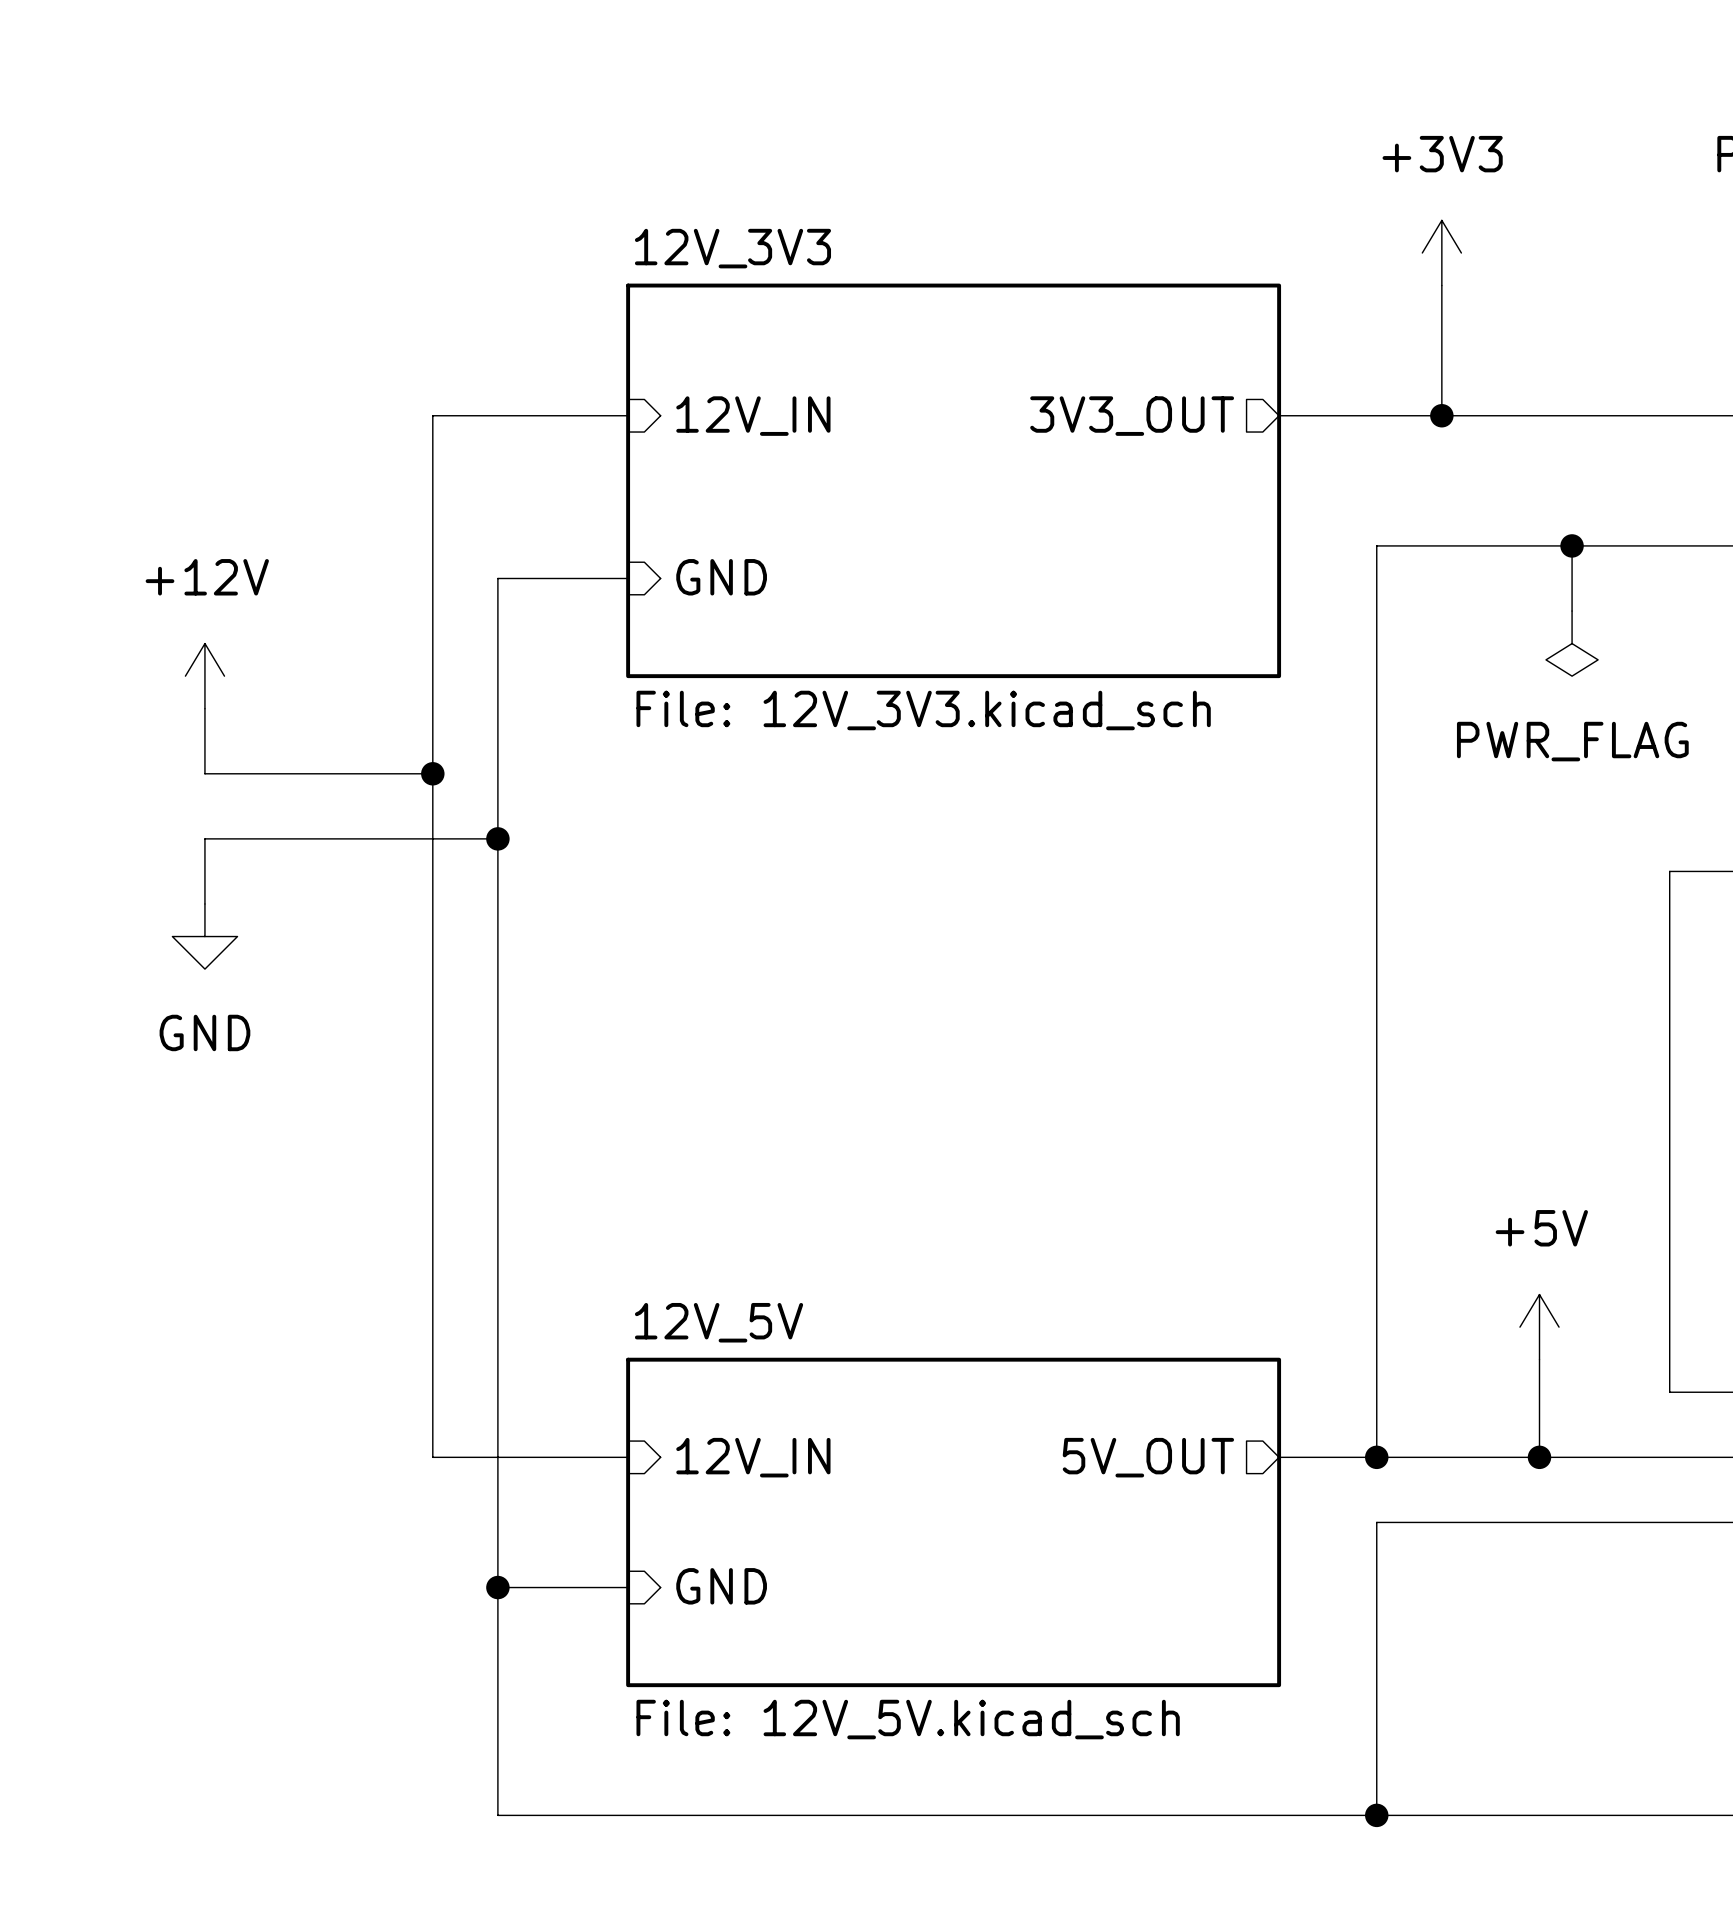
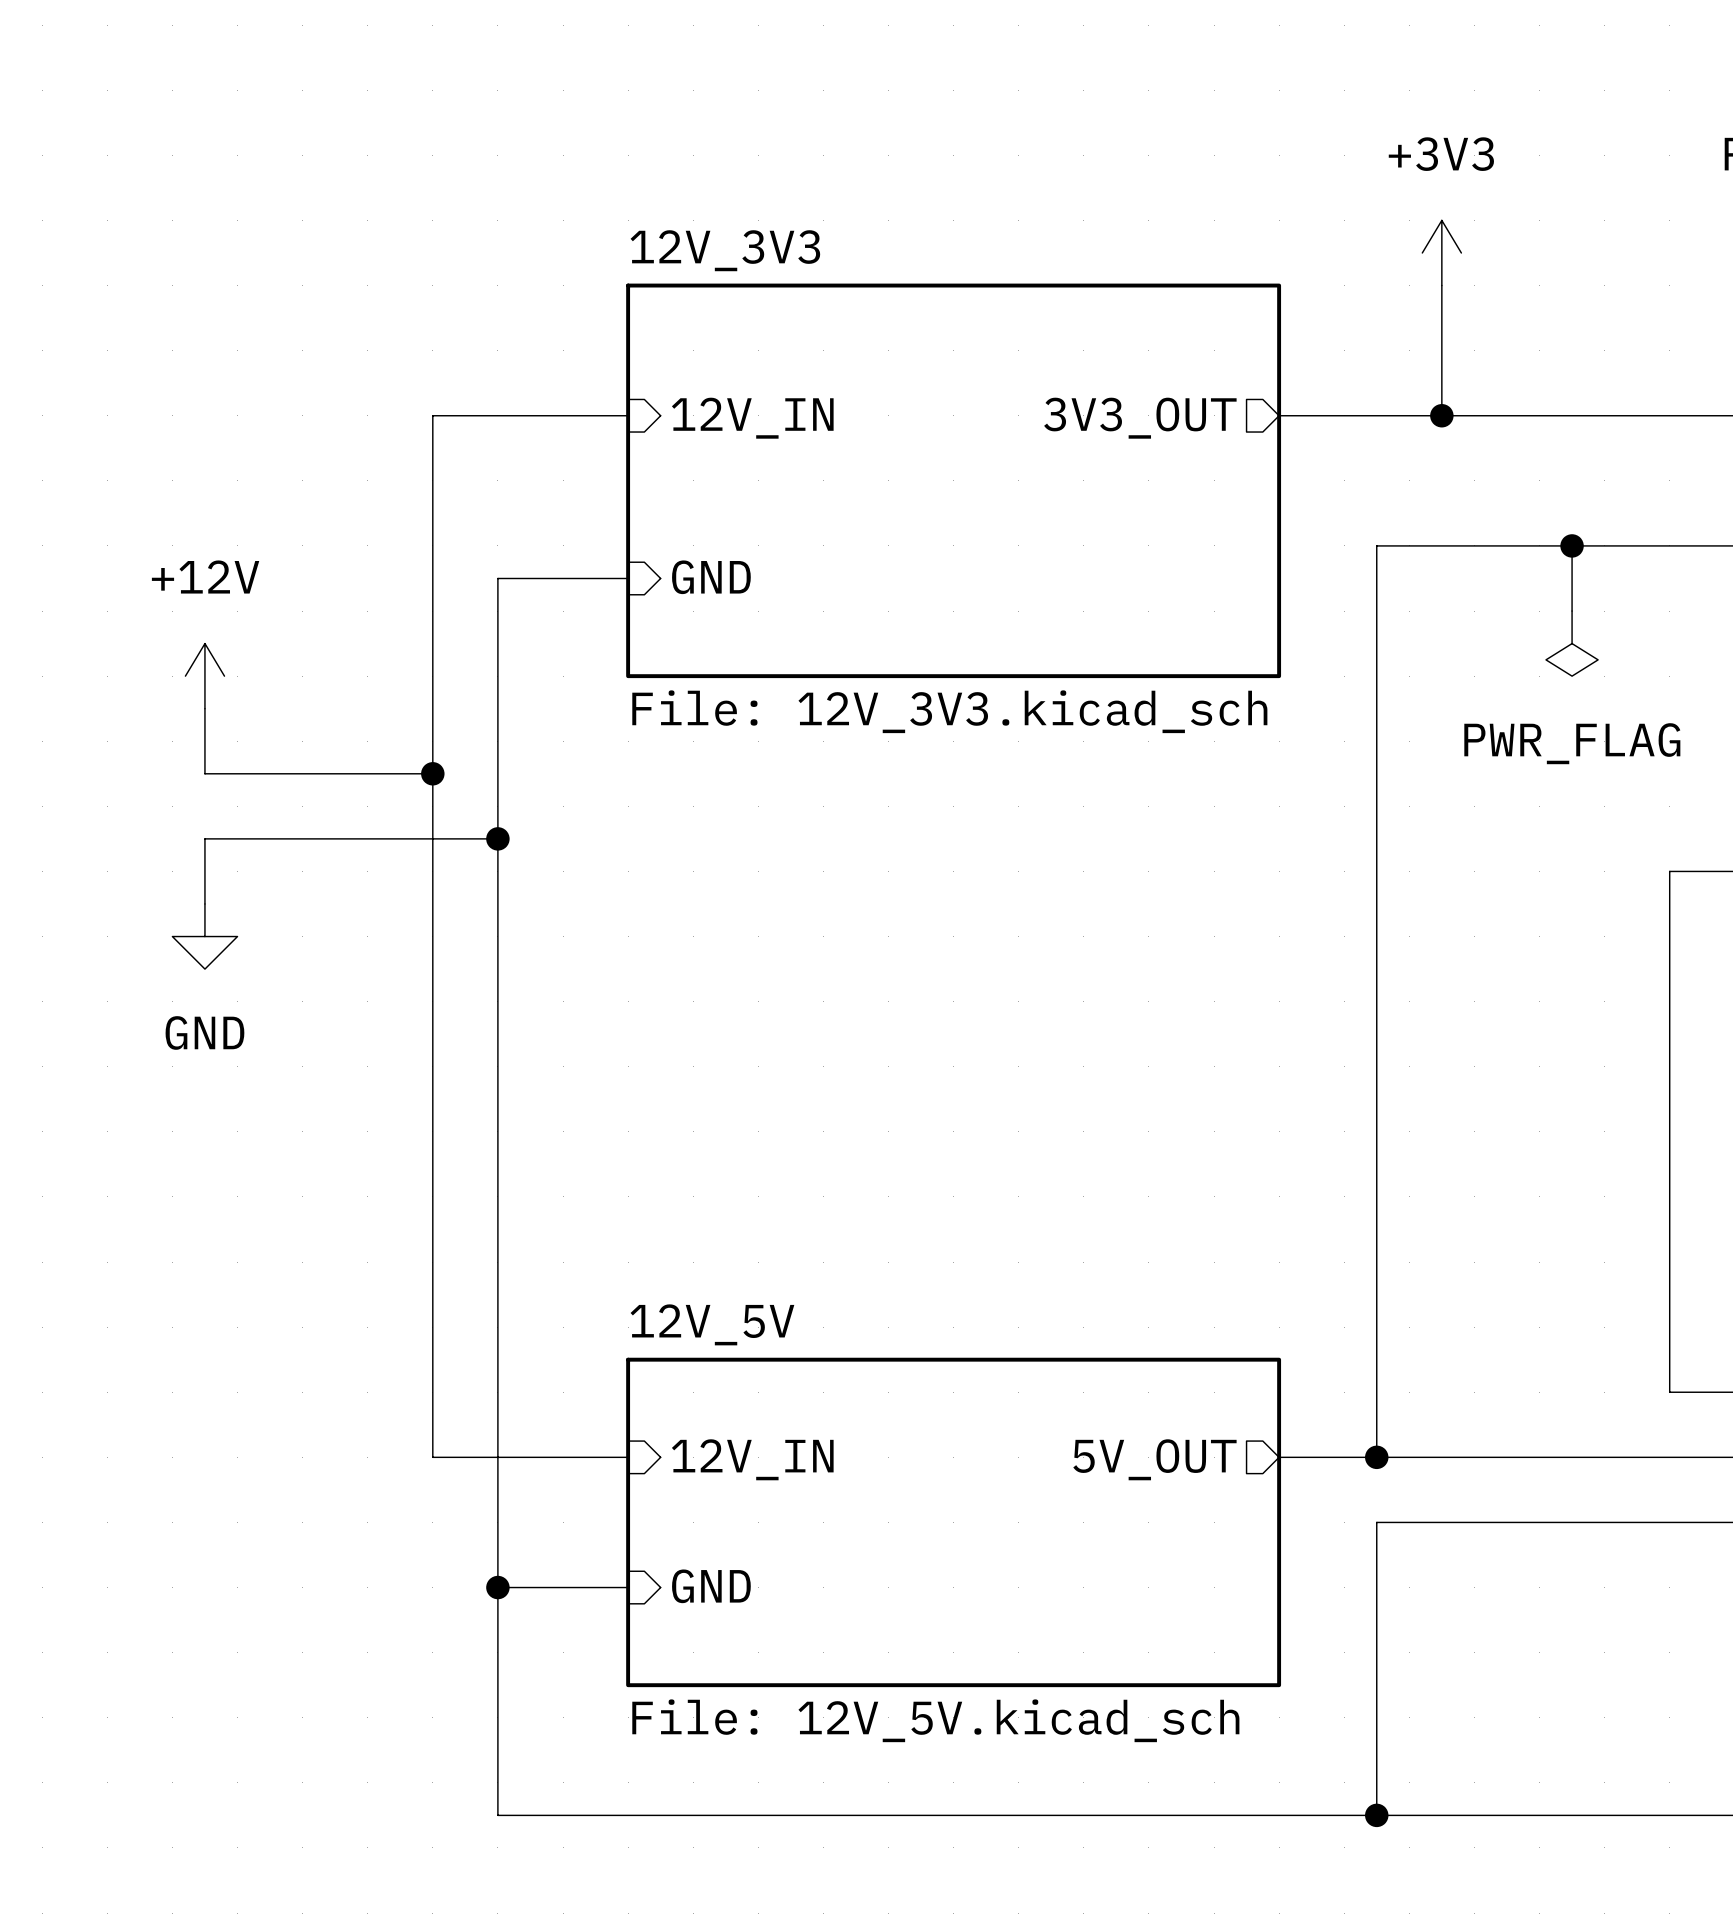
power symbol: +5V (1539, 1327) -> none
wire: (1539, 1359) (1539, 1457) -> none
junction: (1539, 1457) -> none

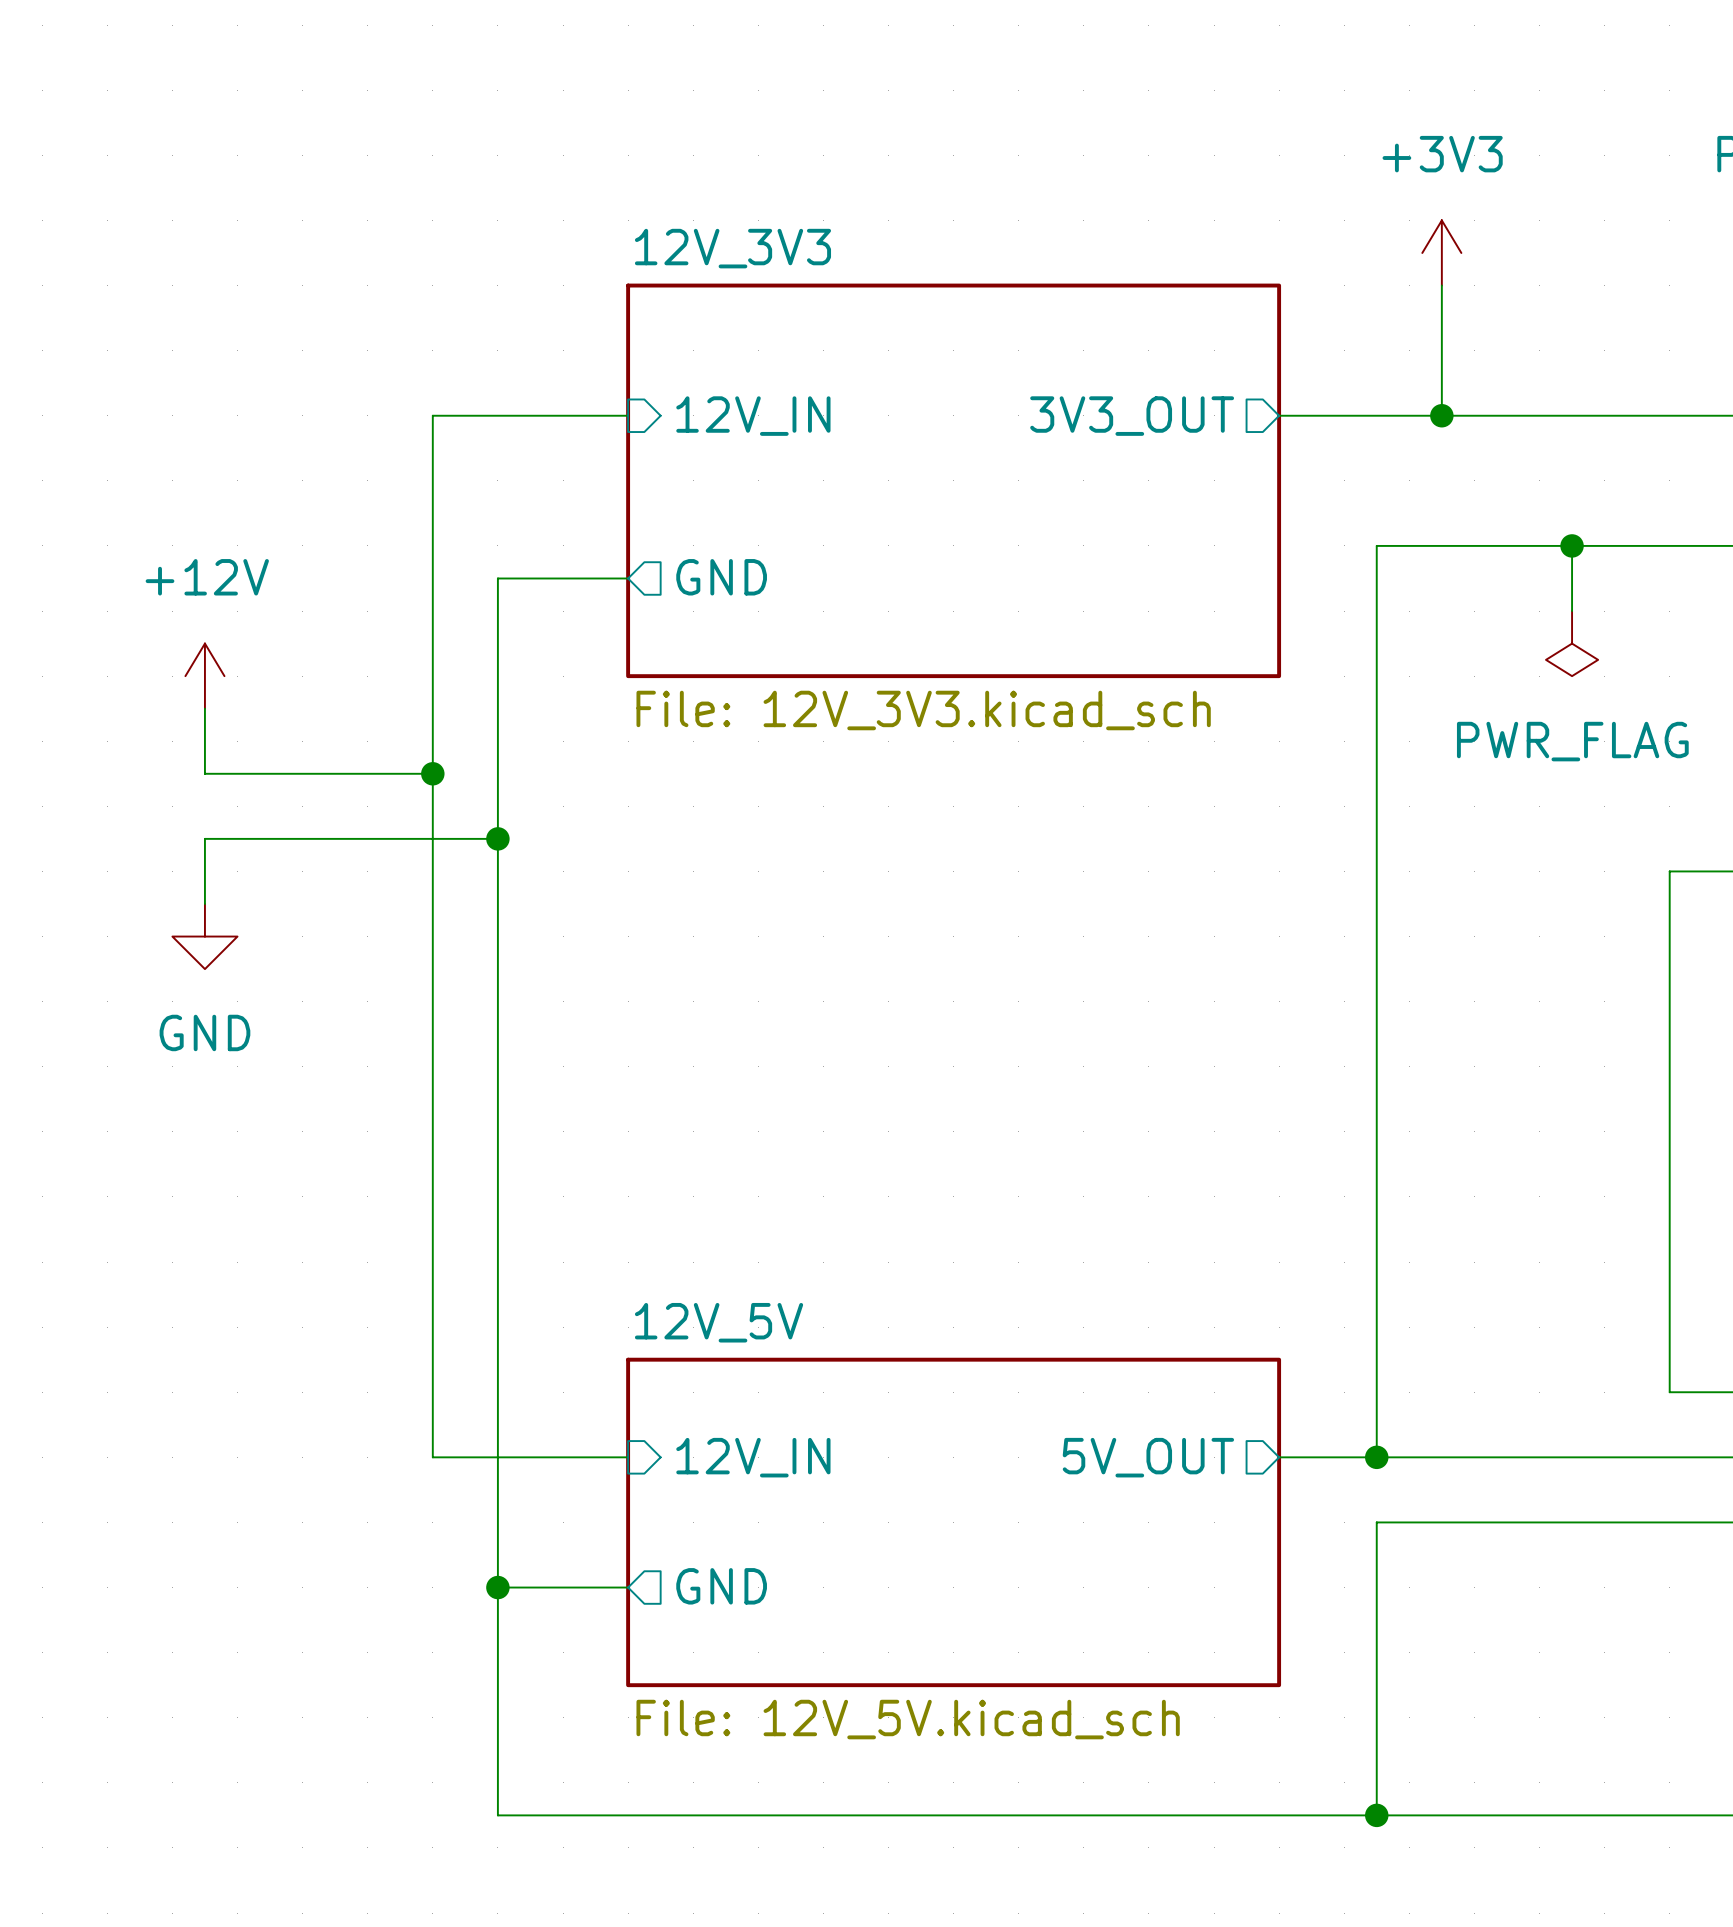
sheet pin shape: input (711, 577) -> output (721, 577)
sheet pin shape: input (711, 1586) -> output (721, 1586)

